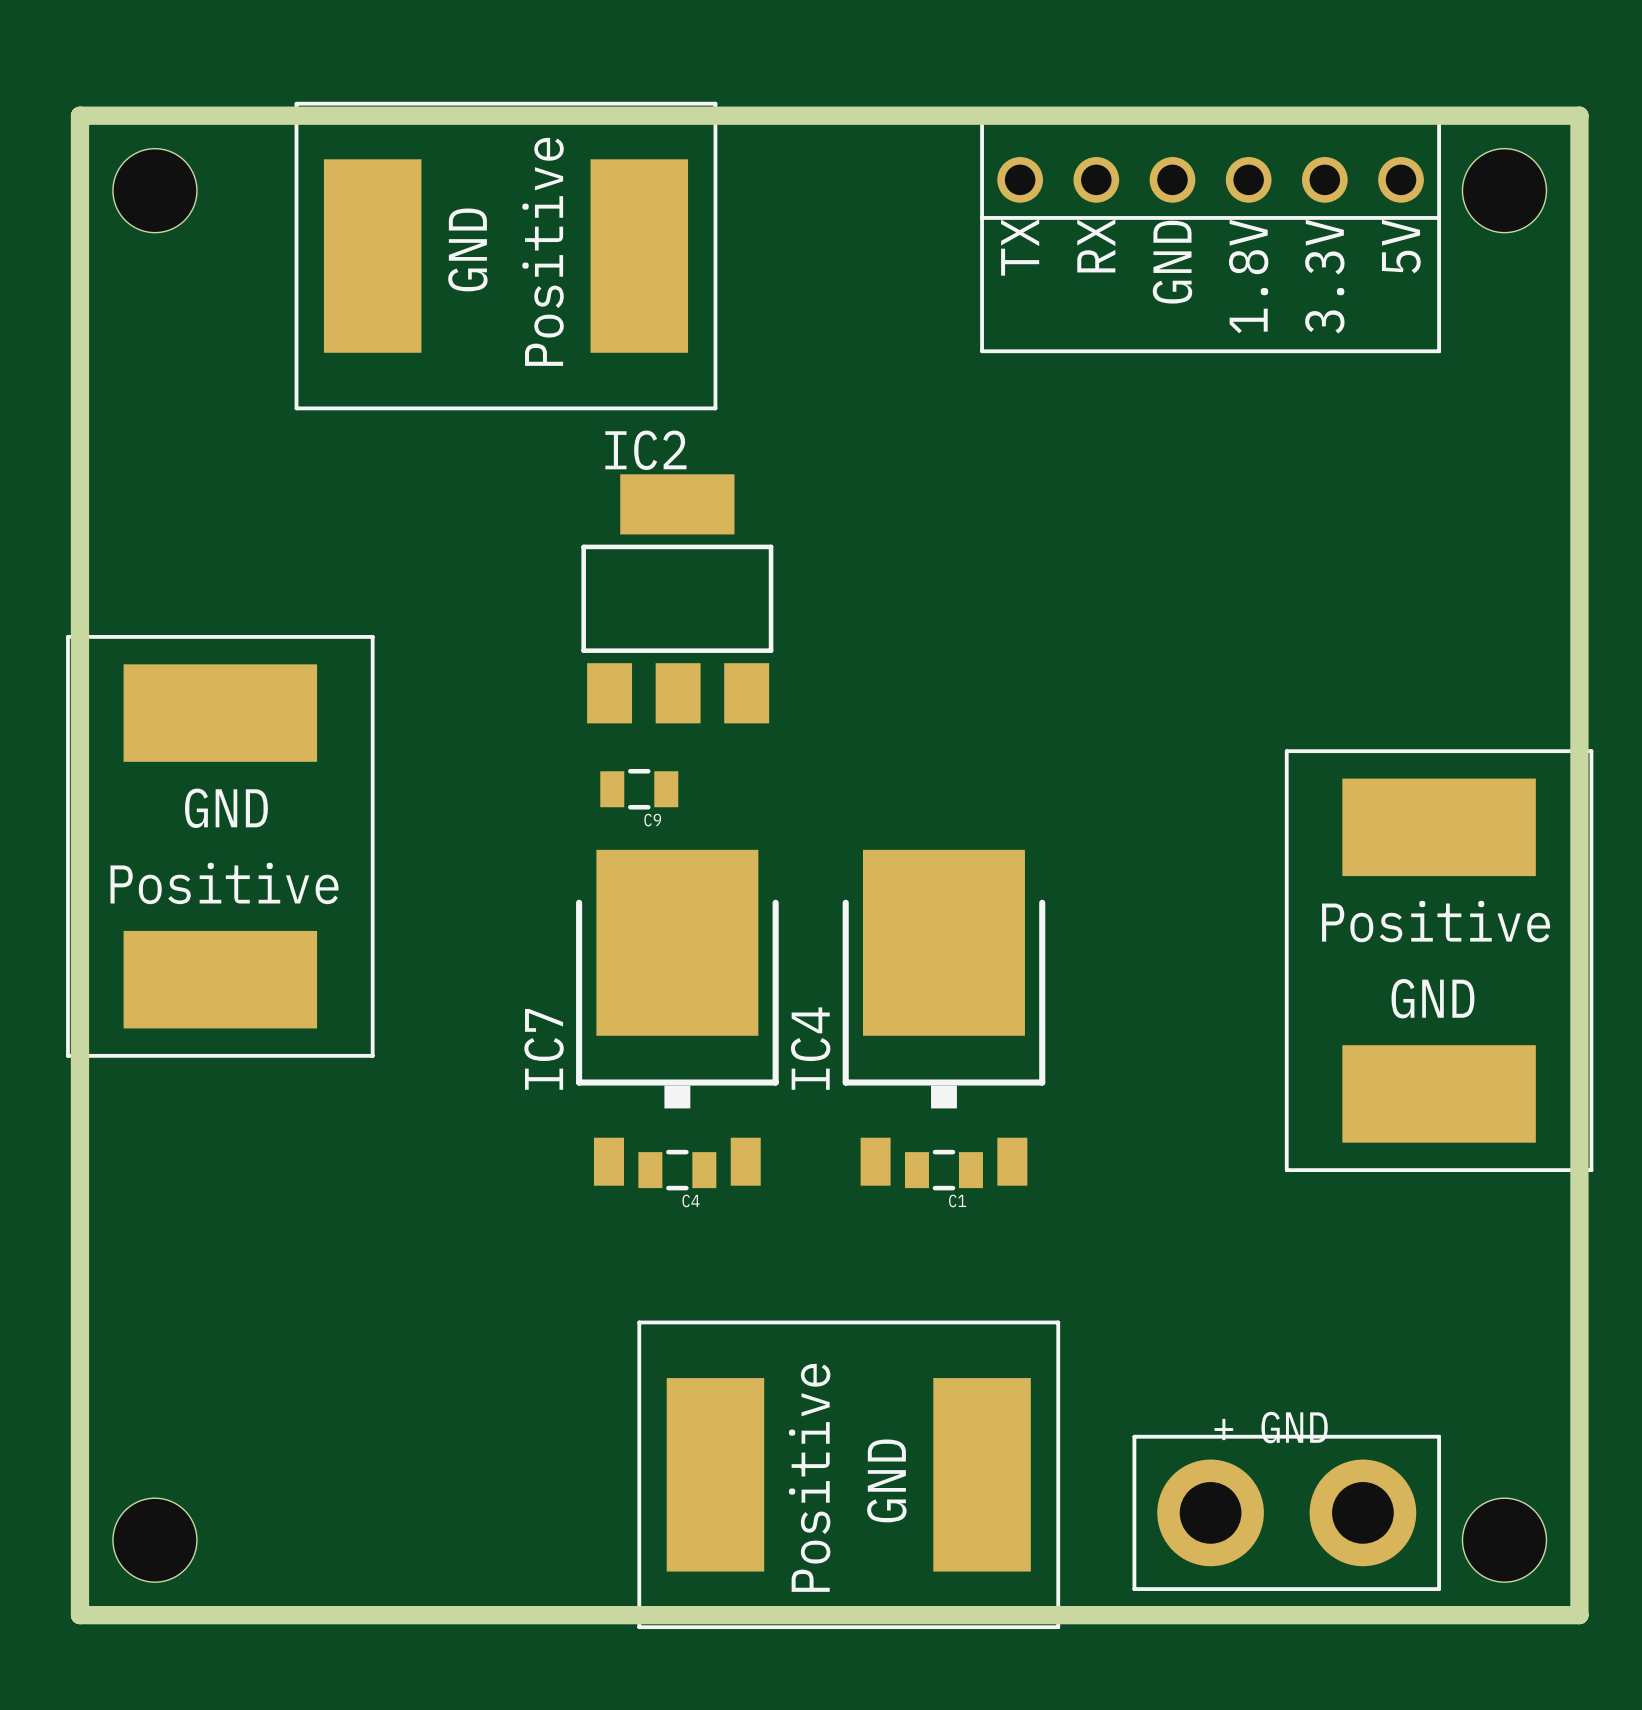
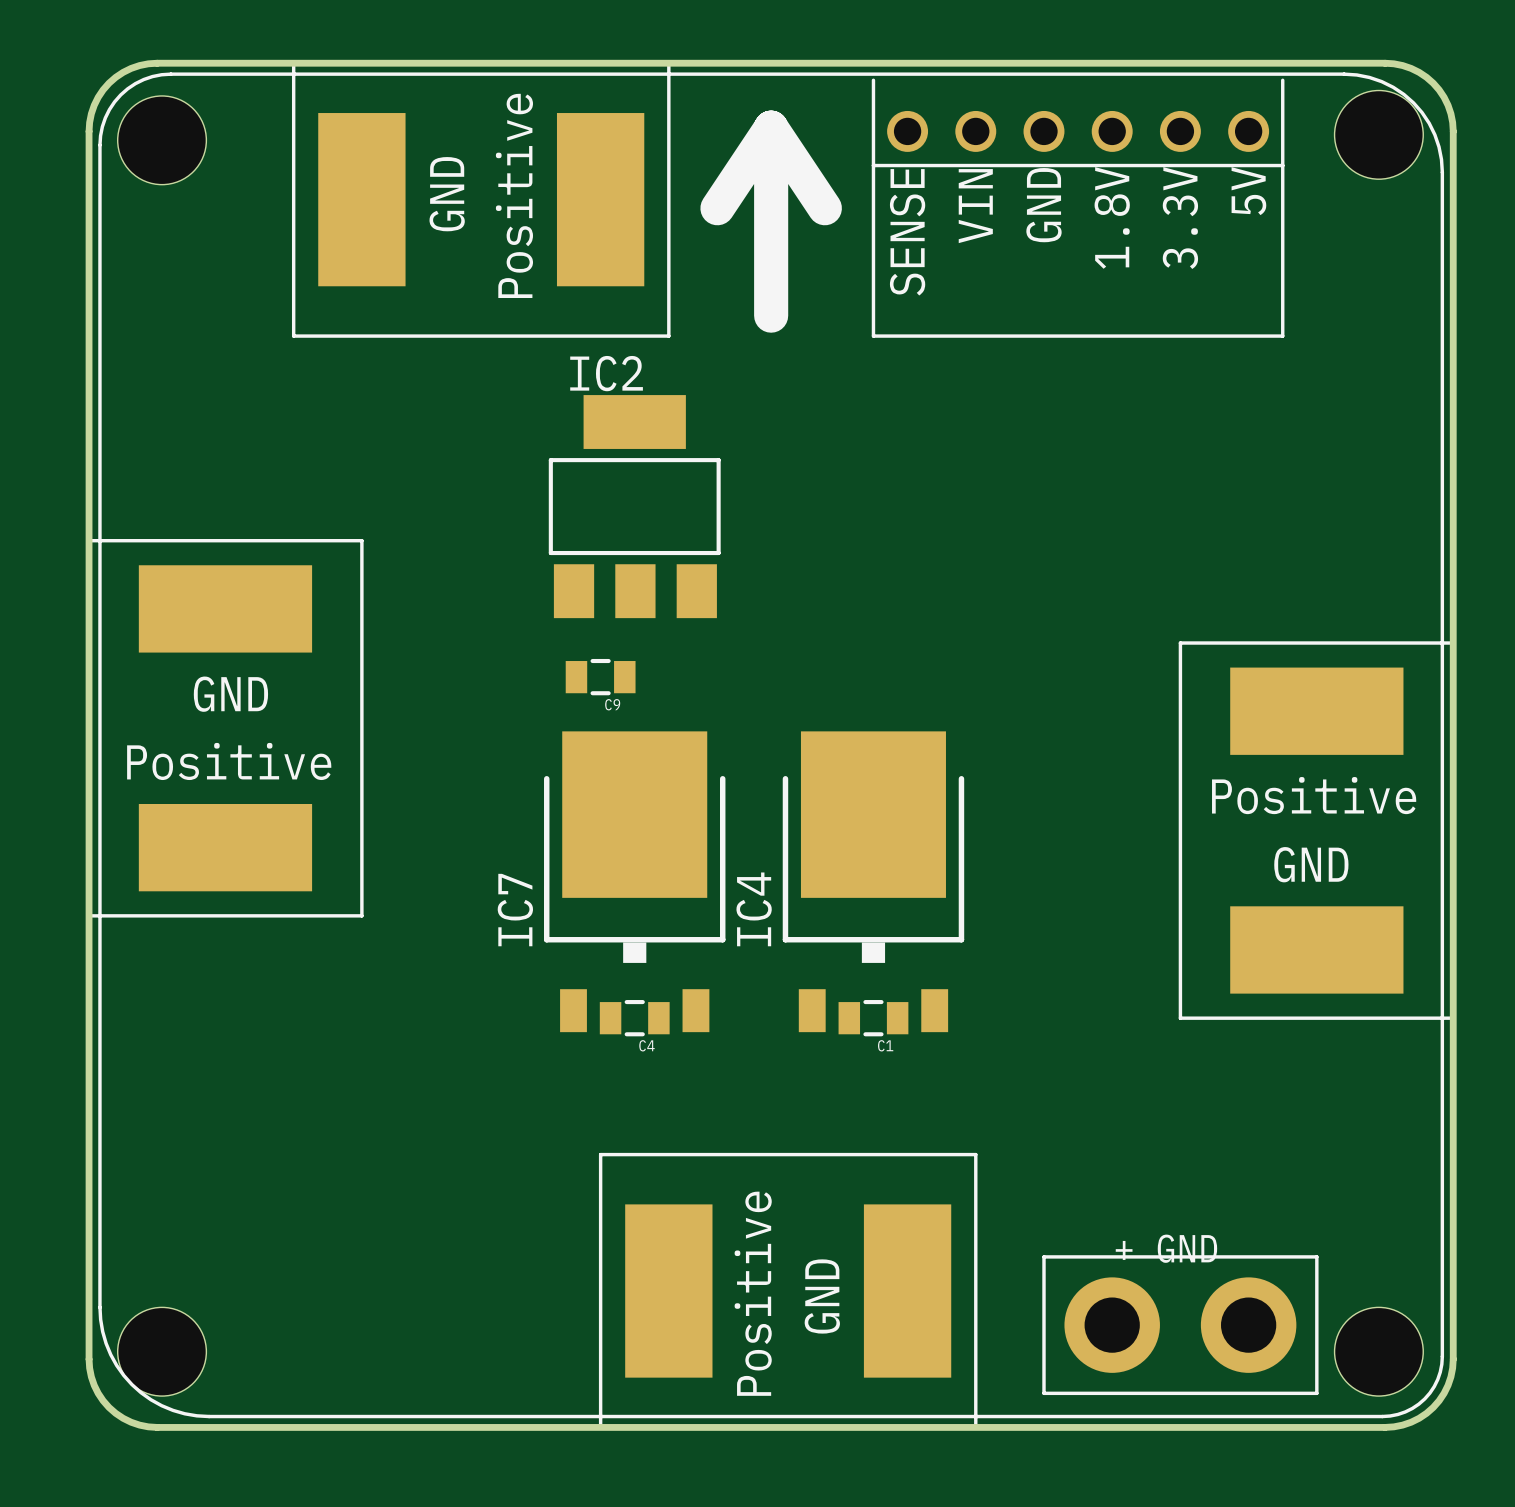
board edge: none -> (157, 63) (1385, 63) (1411, 68) (1433, 83) (1448, 105) (1453, 131) (1453, 1359) (1448, 1385) (1433, 1407) (1411, 1422) (1385, 1427) (157, 1427) (131, 1422) (109, 1407) (94, 1385) (89, 1359) (89, 131) (94, 105) (109, 83) (131, 68) (157, 63)
part footprint: [70, 106, 1589, 1625] -> [98, 72, 1445, 1419]
part: none -> (1378, 134)
part: none -> (162, 140)
part: none -> (162, 1351)
part: none -> (1378, 1351)

